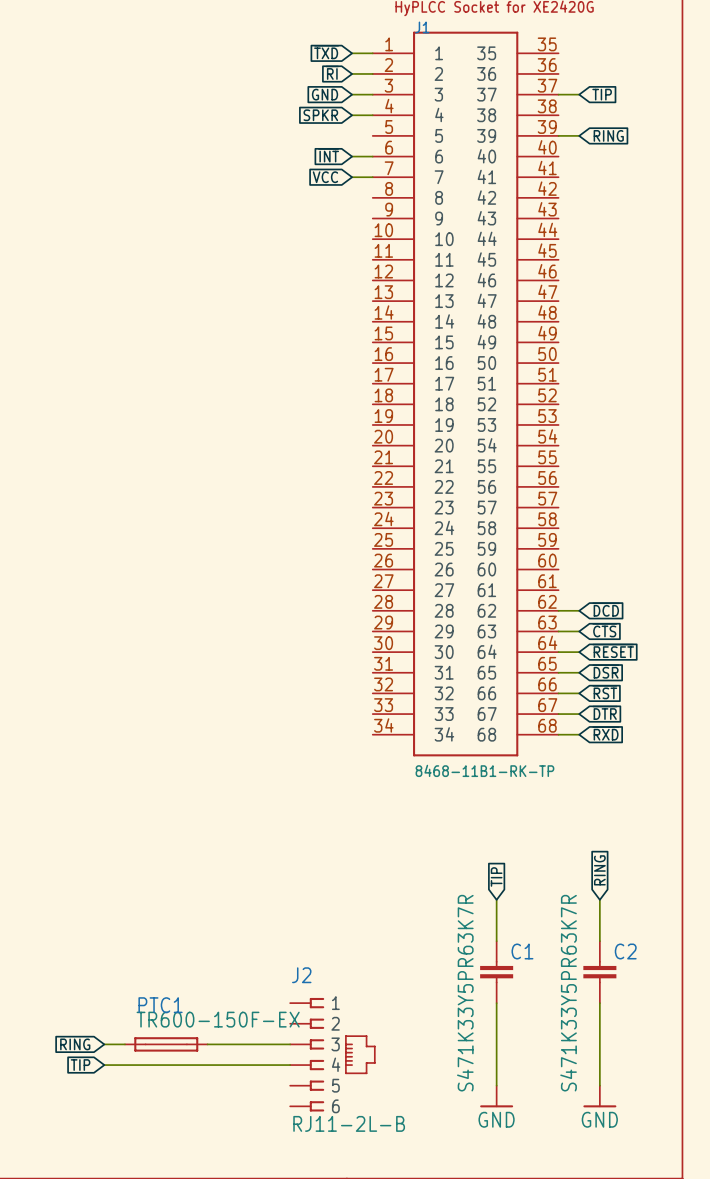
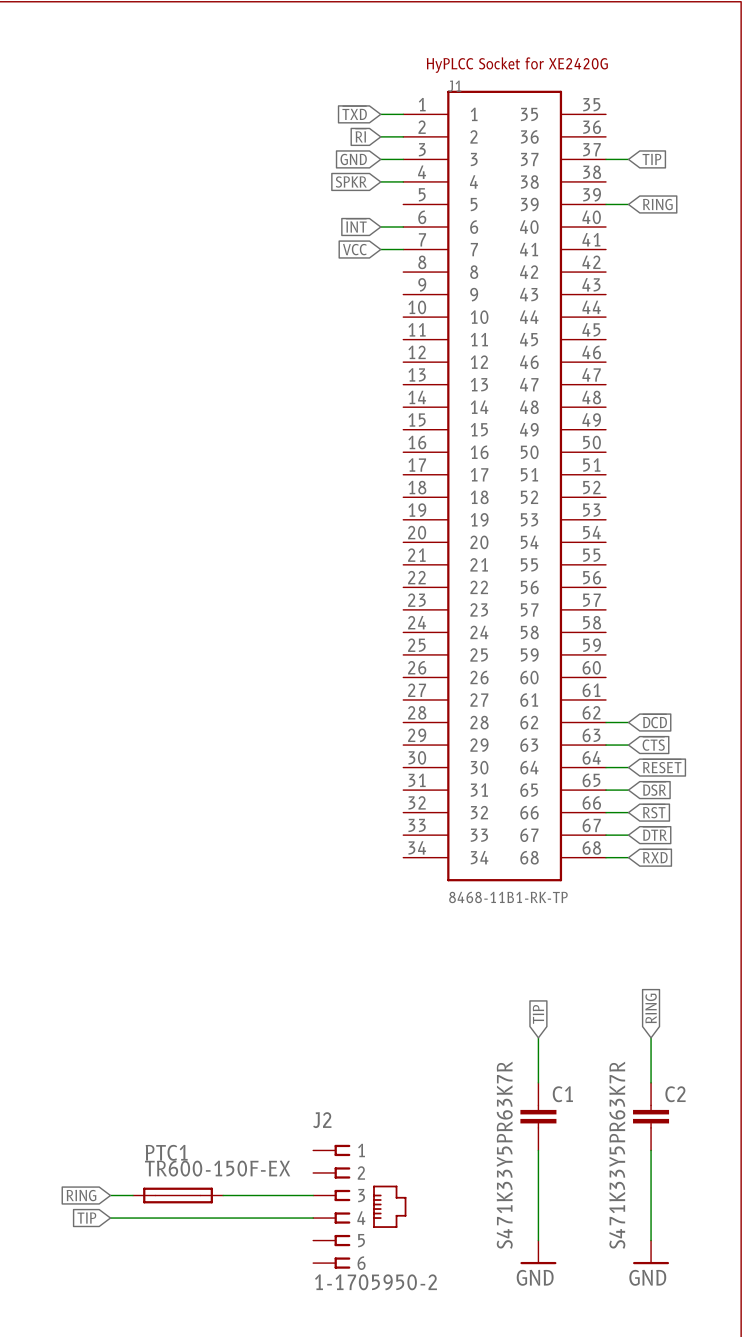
J2 value: RJ11-2L-B (349, 1123) -> 1-1705950-2 (375, 1282)

